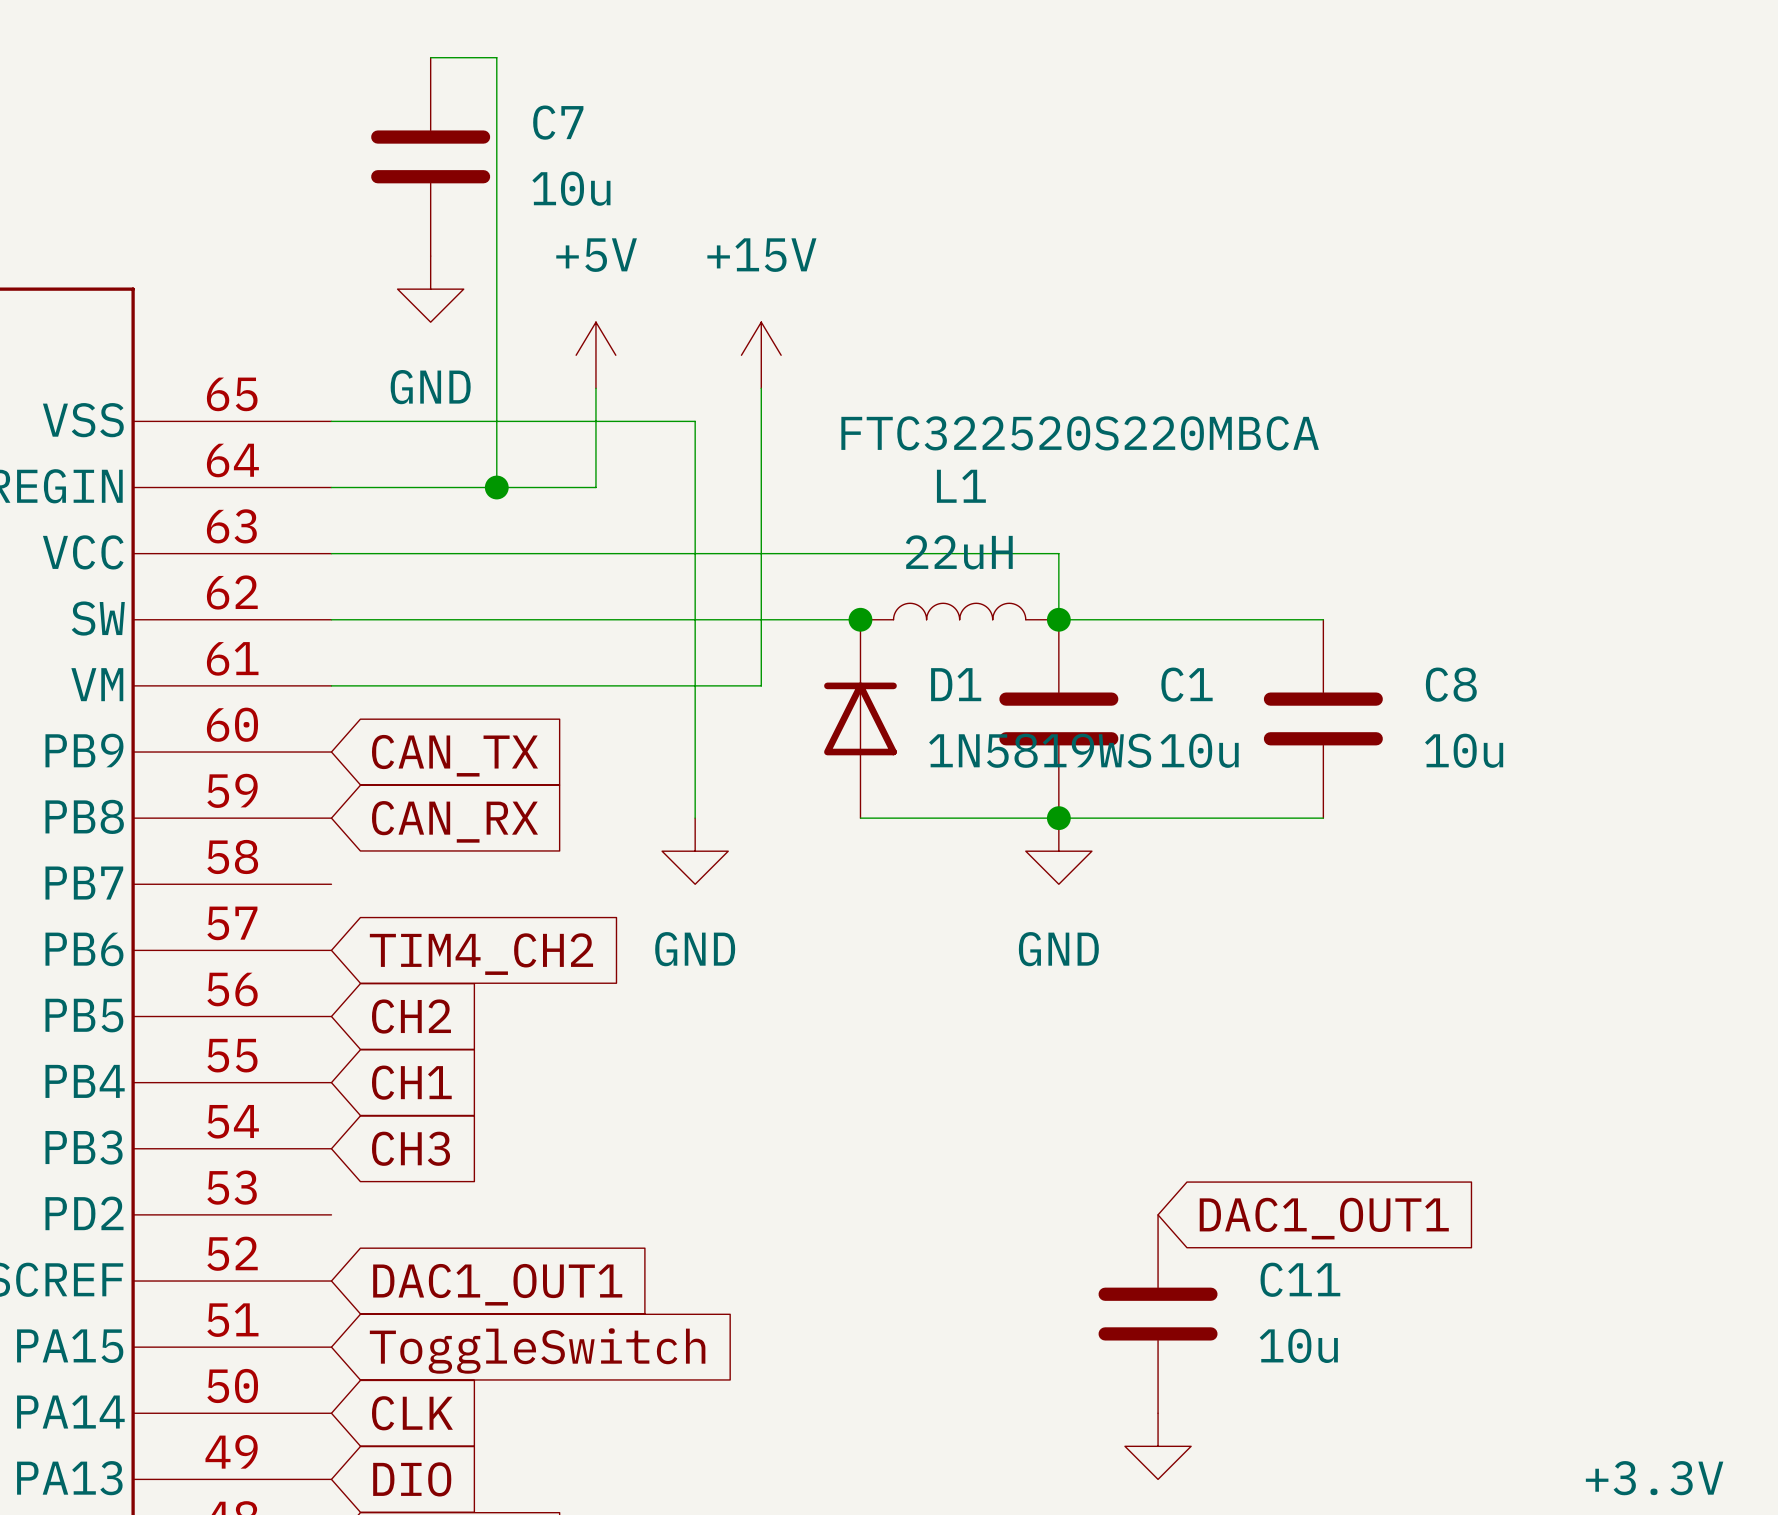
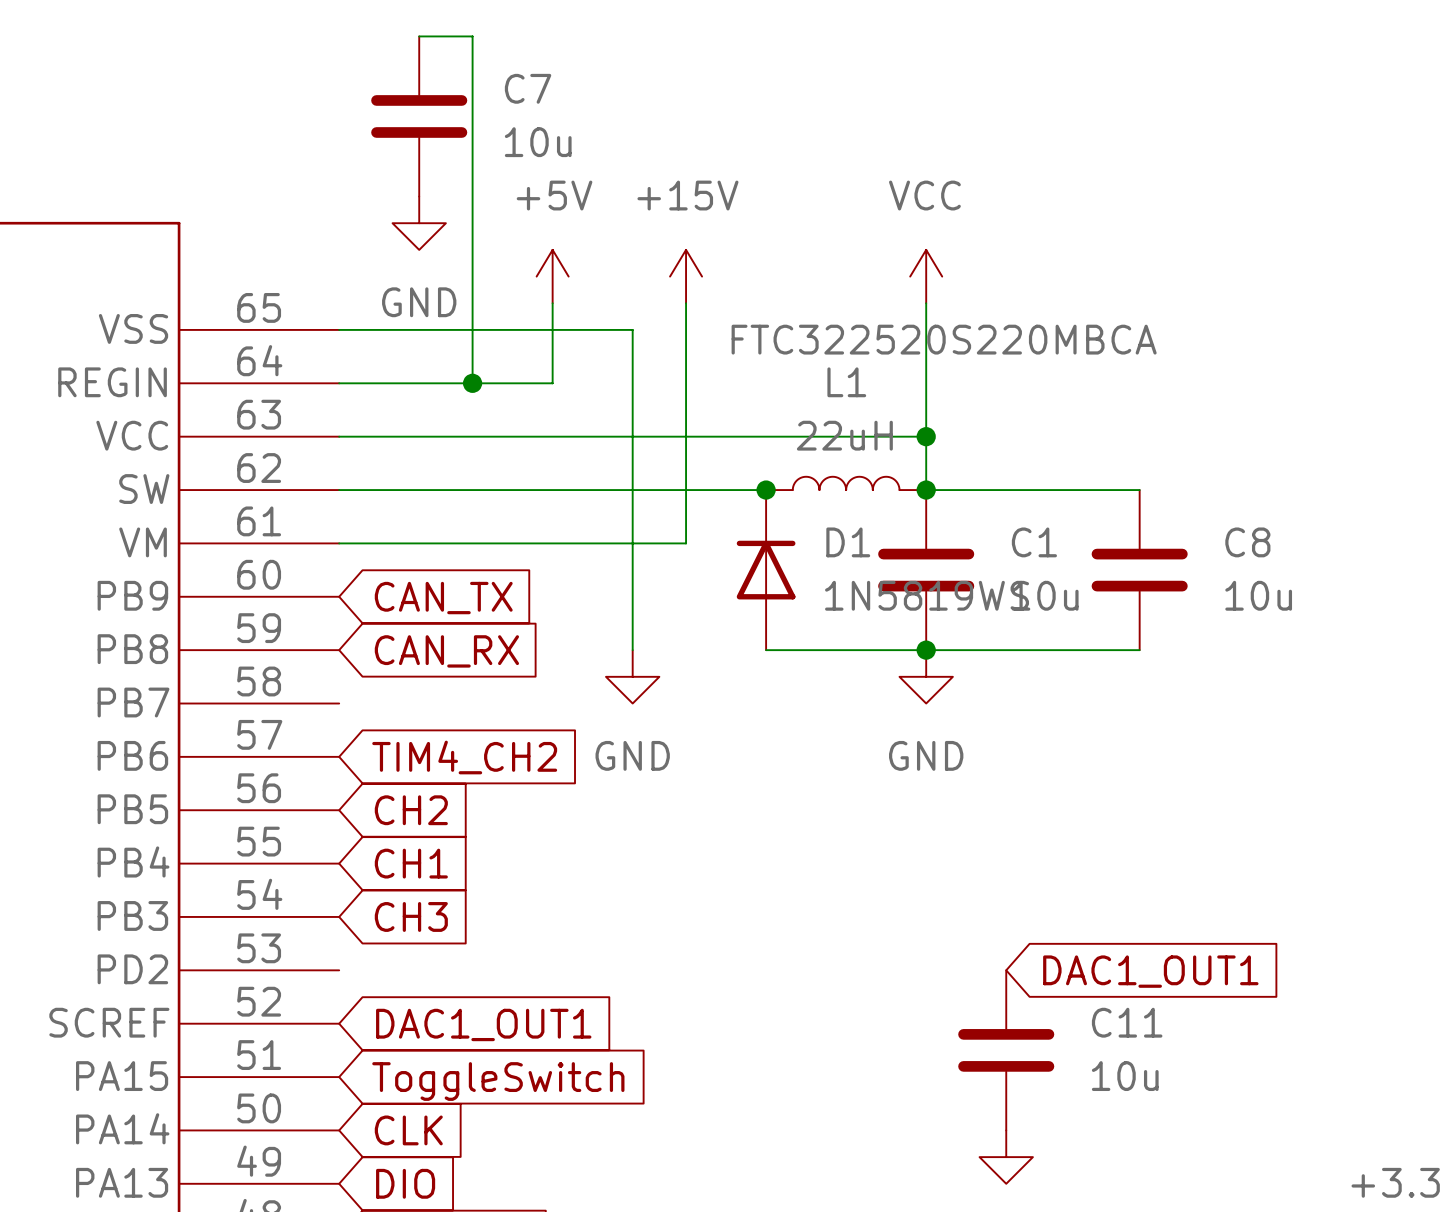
power symbol: none -> VCC (926, 276)
wire: none -> (926, 303) (926, 436)
junction: none -> (926, 436)

